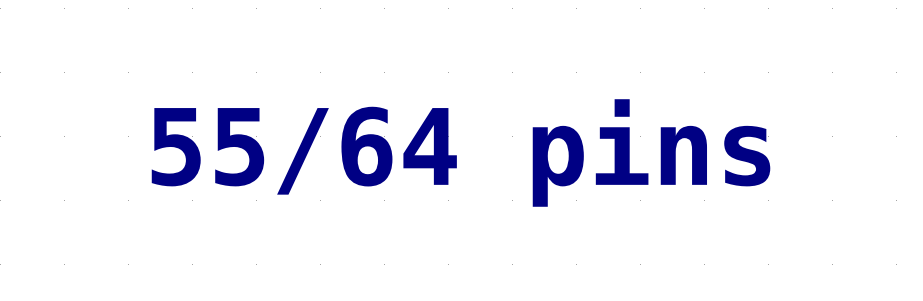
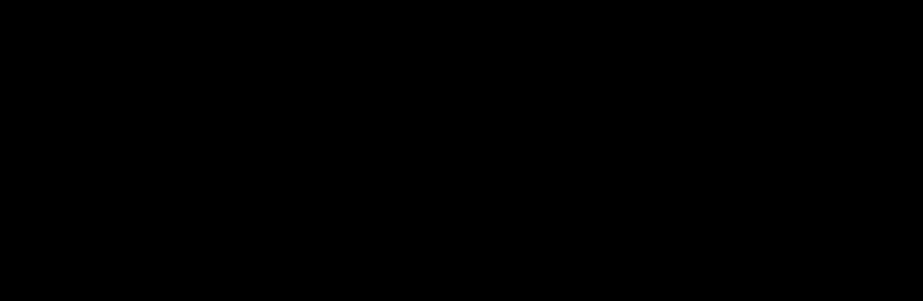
text: 55/64 pins (461, 152) -> none

